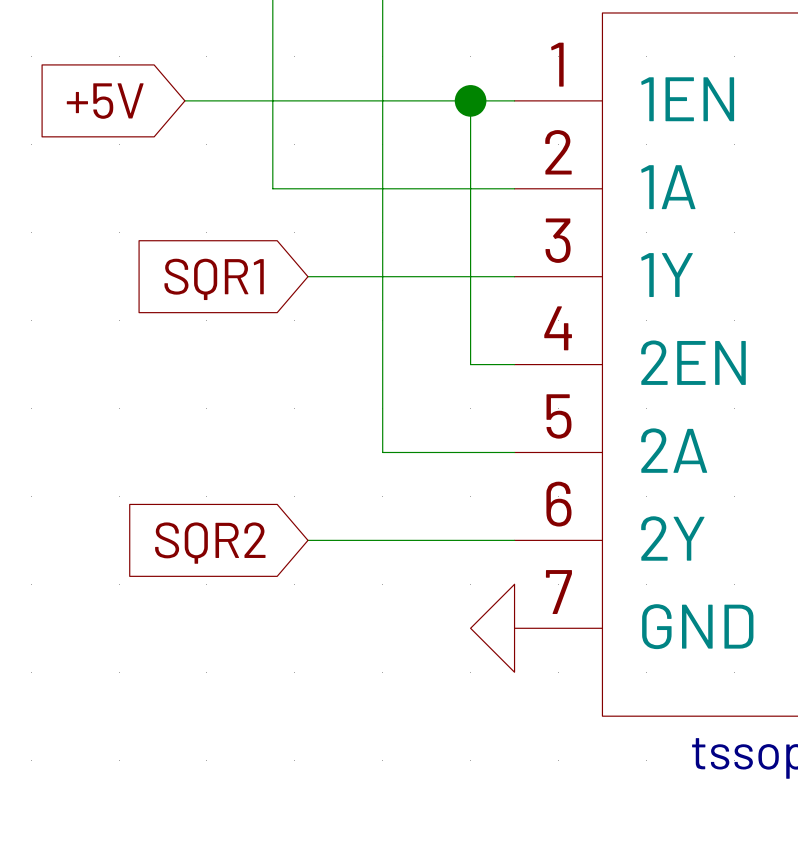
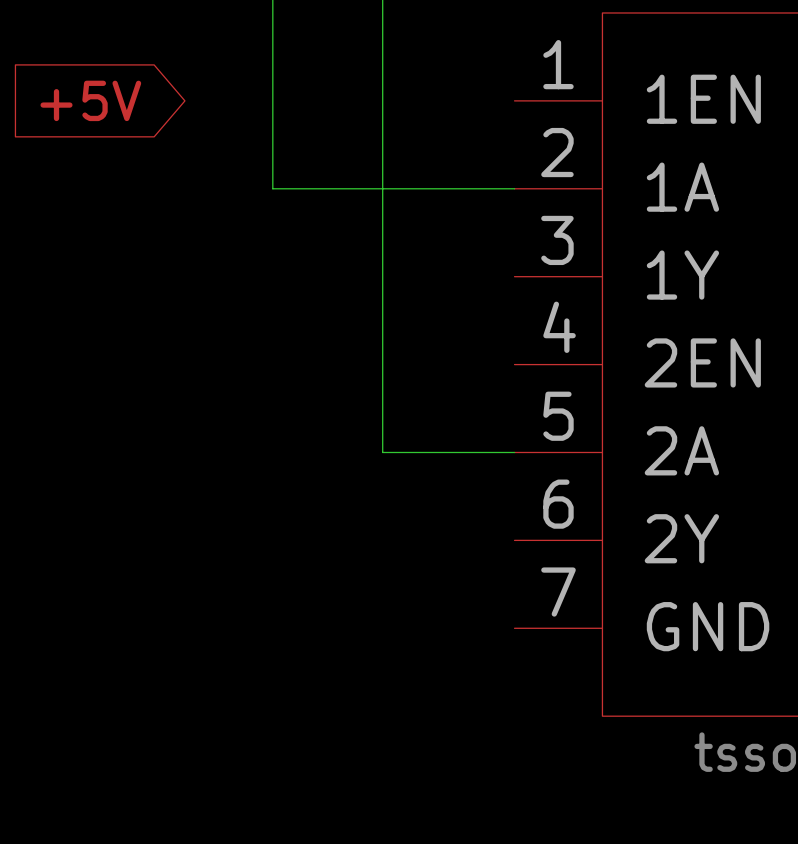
wire: (184, 100) (514, 100) -> none
wire: (470, 100) (470, 364) (514, 364) -> none
junction: (470, 100) -> none
wire: (307, 276) (514, 276) -> none
global label: SQR1 (214, 279) -> none
wire: (307, 540) (514, 540) -> none
global label: SQR2 (210, 543) -> none
power symbol: (492, 628) -> none

